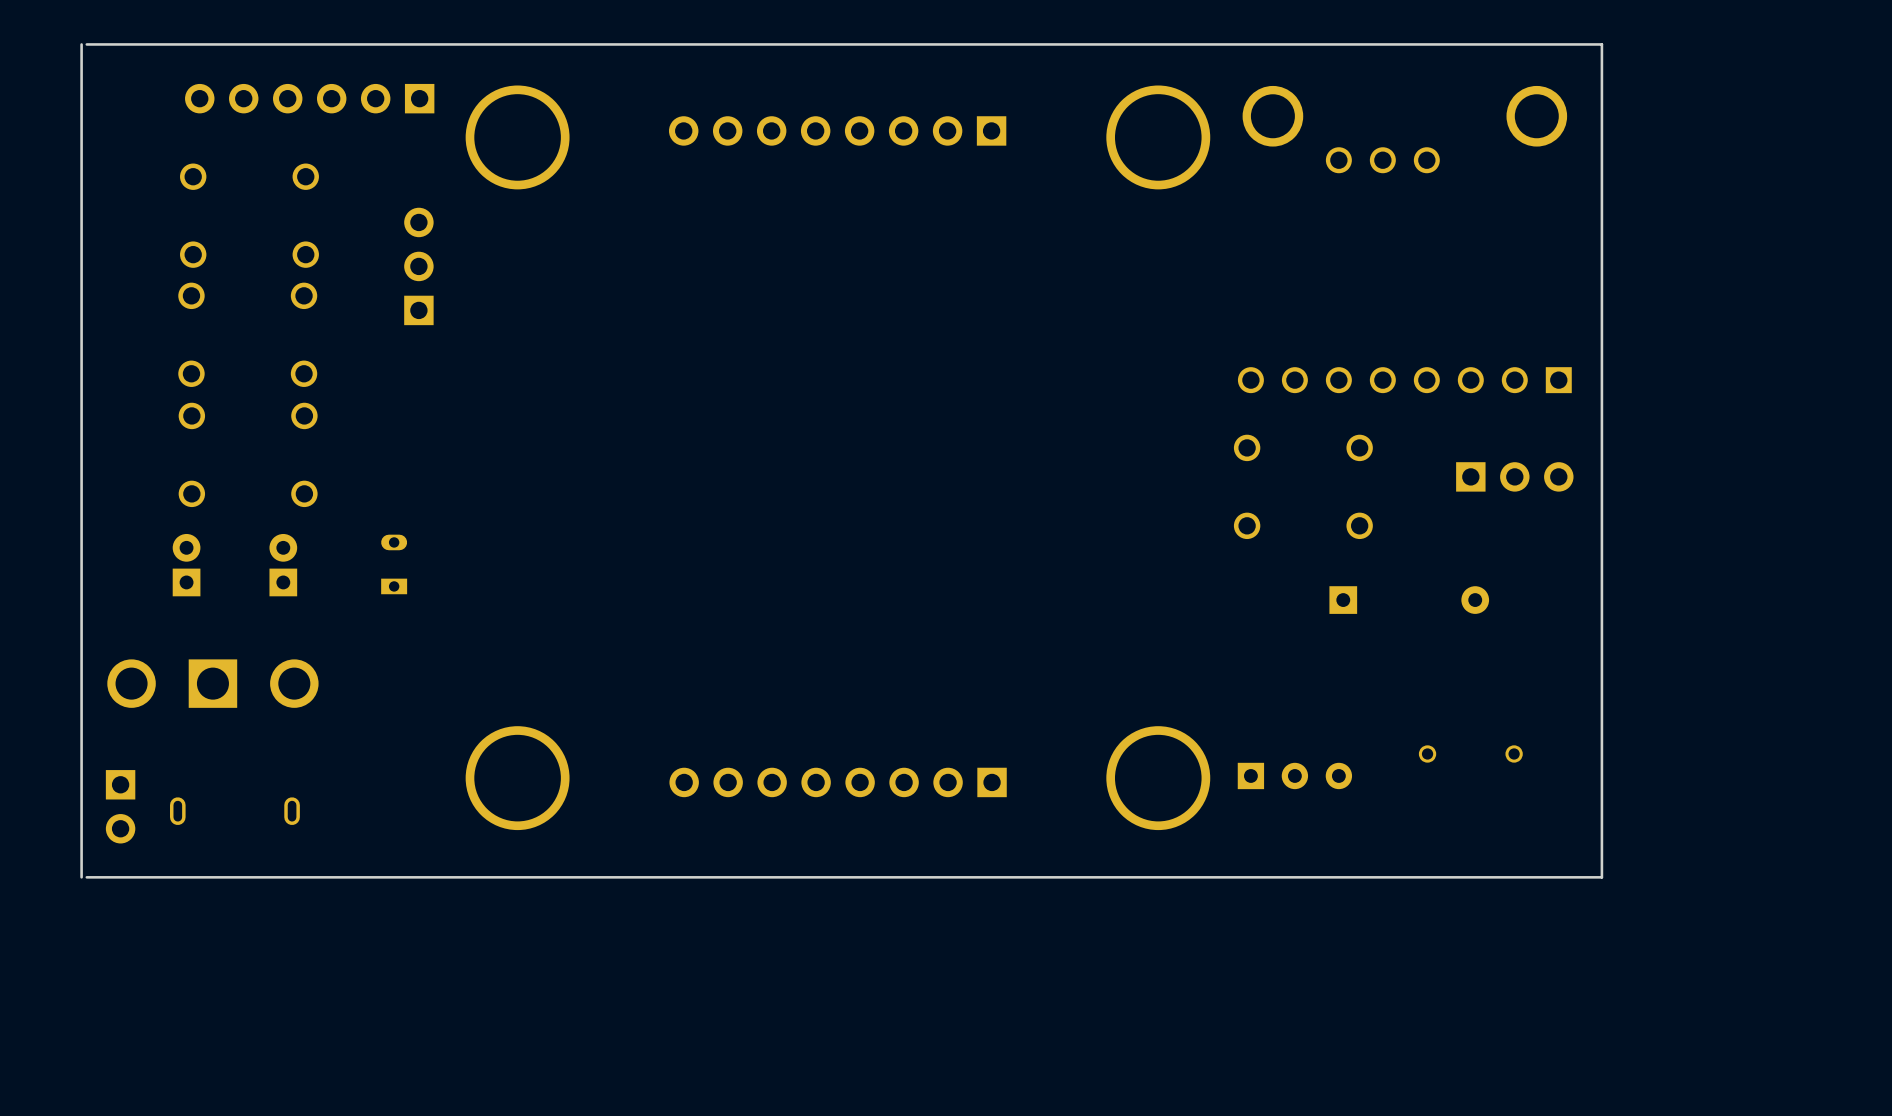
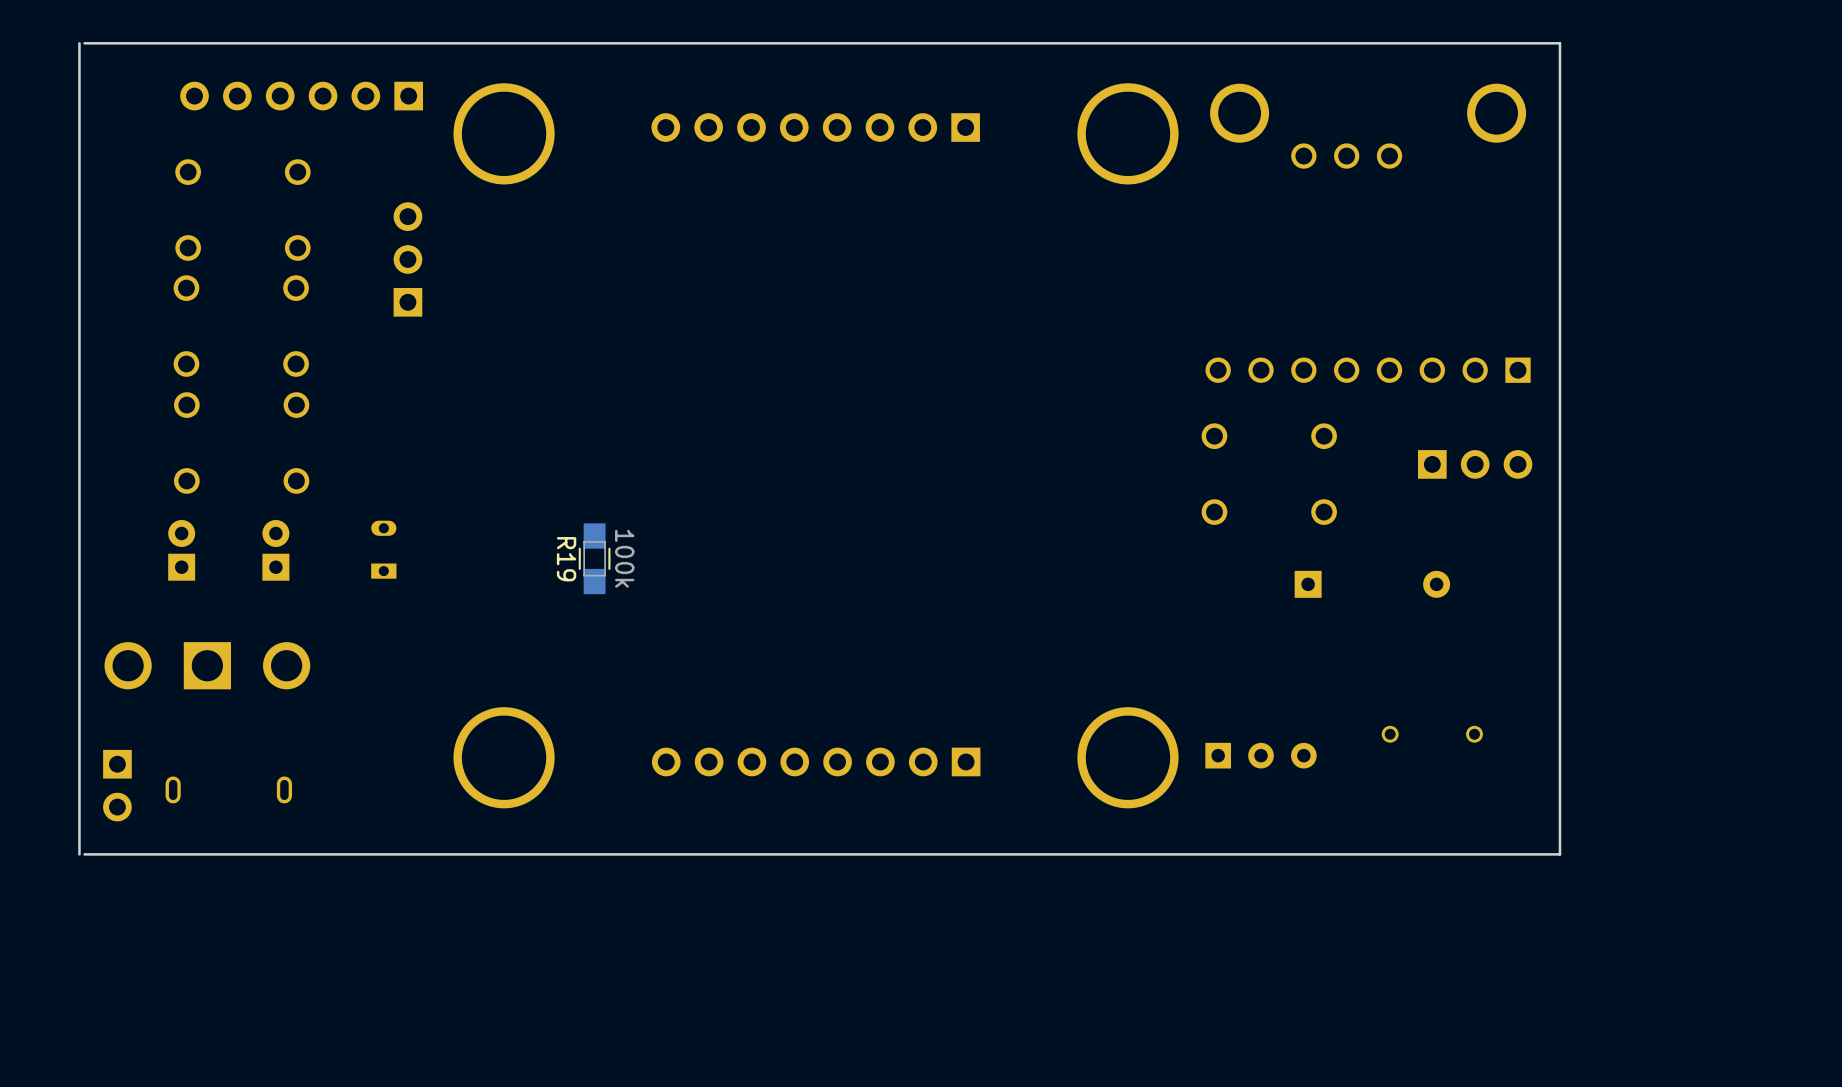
R19: none -> 100k (594, 558)

